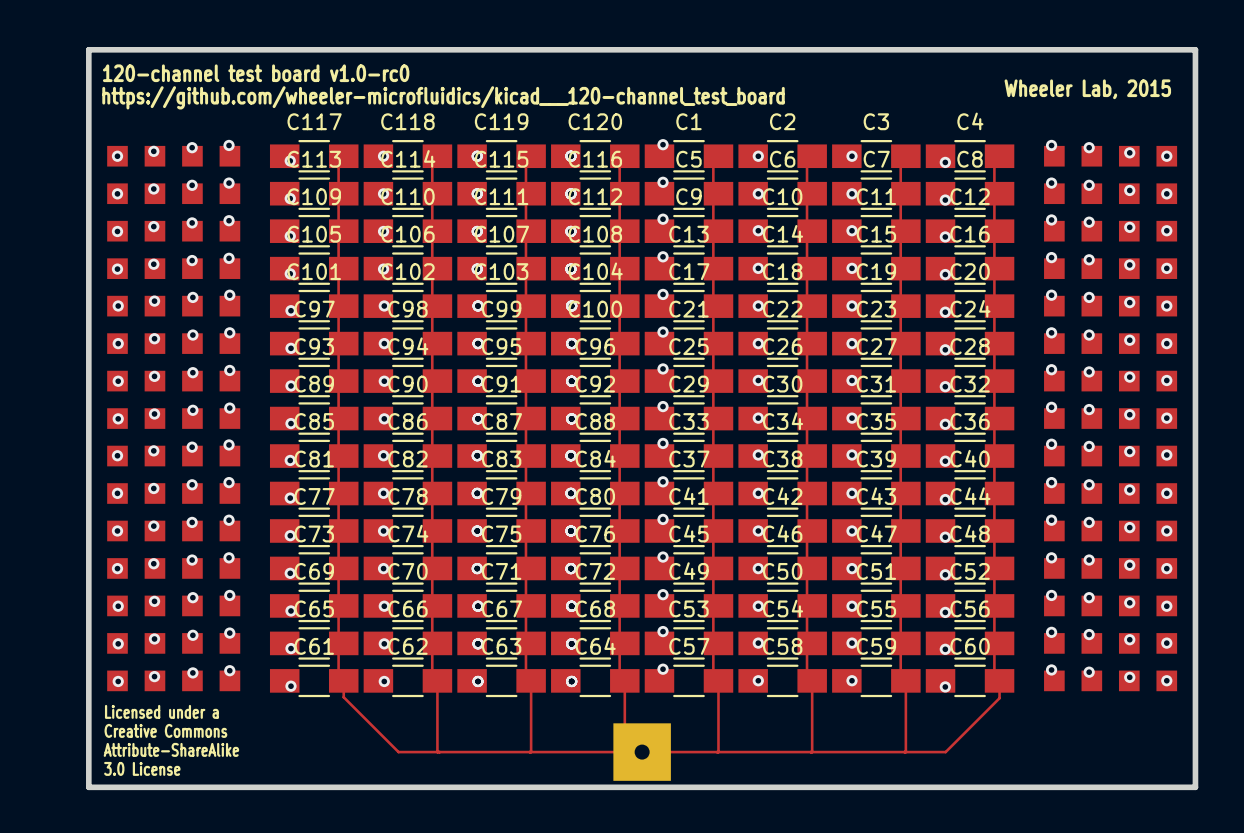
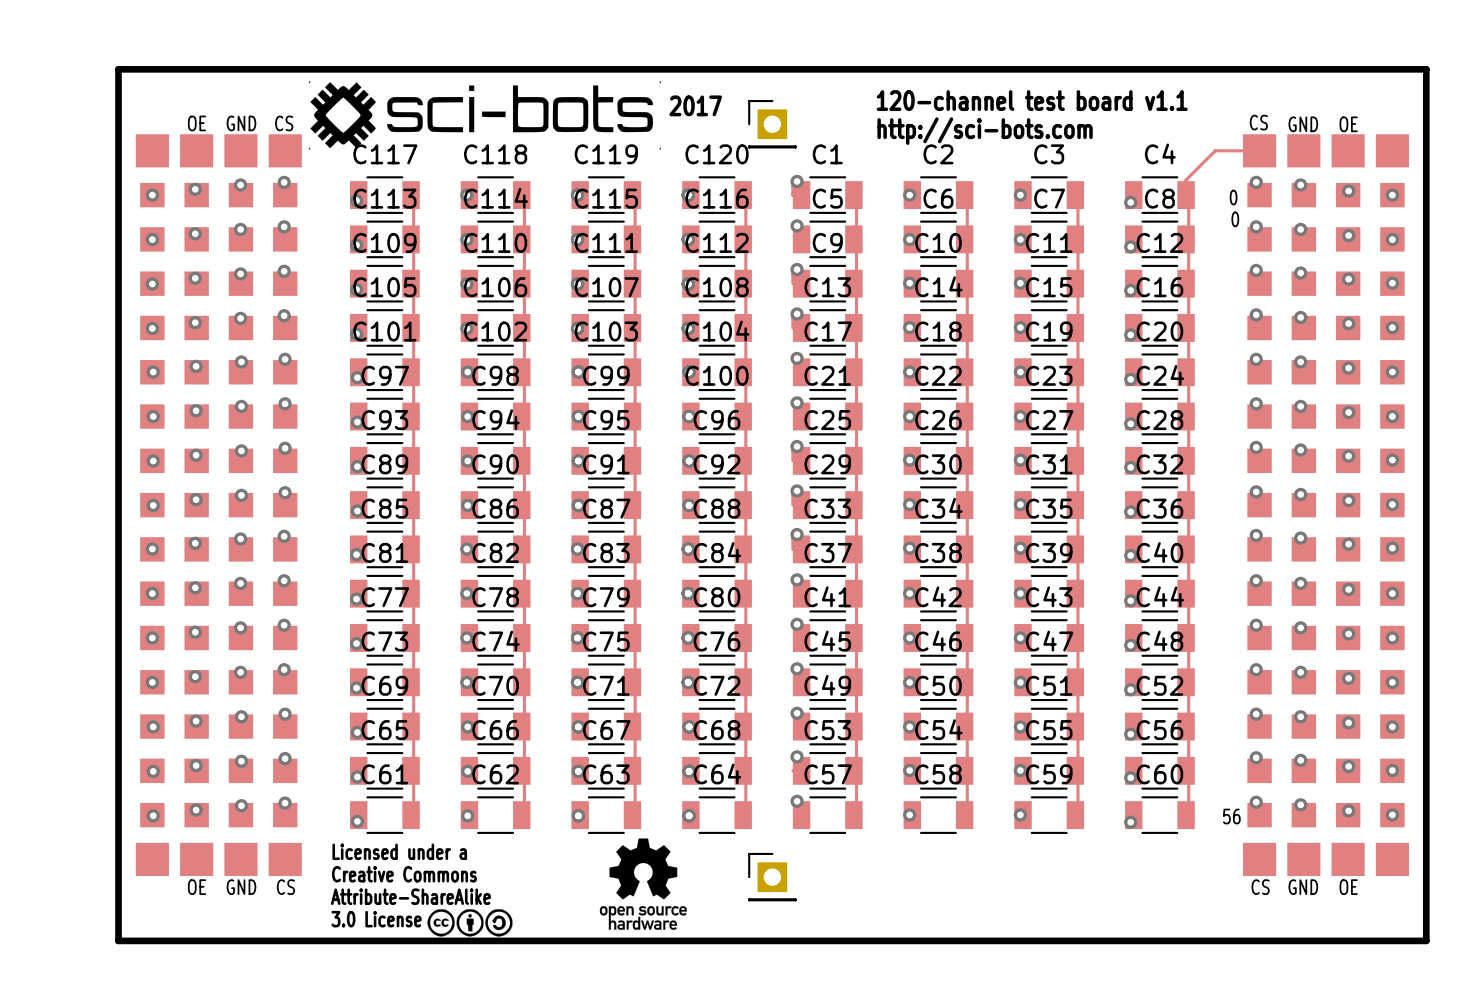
drawing: none -> [308, 81, 662, 150]
text: 120-channel test board v1.0-rc0 (256, 73) -> none
text: none -> 120-channel test board v1.1 (1032, 100)
text: none -> 2017 (695, 105)
text: Wheeler Lab, 2015 (1087, 89) -> GND (1303, 124)
text: none -> CS (1258, 122)
text: none -> OE (197, 123)
text: none -> GND (241, 123)
text: none -> CS (284, 123)
part: none -> (772, 124)
text: none -> OE (1348, 124)
text: https://github.com/wheeler-microfluidics/kicad___120-channel_test_board (443, 97) -> none
text: none -> http://sci-bots.com (985, 131)
part: none -> (152, 150)
part: none -> (196, 150)
part: none -> (240, 150)
part: none -> (285, 150)
track: none -> (1259, 150) (1215, 150) (1186, 180) (1186, 195)
part: none -> (1259, 150)
part: none -> (1303, 150)
part: none -> (1348, 150)
part: none -> (1392, 150)
C117 footprint: [269, 140, 359, 173] -> [350, 176, 420, 214]
C118 footprint: [363, 140, 453, 173] -> [460, 176, 531, 214]
C119 footprint: [457, 140, 546, 173] -> [571, 176, 642, 214]
C120 footprint: [551, 140, 640, 173] -> [682, 176, 752, 214]
C1 footprint: [644, 140, 734, 173] -> [792, 176, 863, 214]
C2 footprint: [738, 140, 827, 173] -> [903, 176, 974, 214]
C3 footprint: [832, 140, 921, 173] -> [1014, 176, 1085, 214]
C4 footprint: [925, 140, 1015, 173] -> [1125, 176, 1195, 214]
text: none -> 0 (1233, 197)
text: none -> 0 (1235, 219)
C113 footprint: [269, 177, 359, 210] -> [350, 220, 420, 259]
C114 footprint: [363, 177, 453, 210] -> [460, 220, 531, 259]
C115 footprint: [457, 177, 546, 210] -> [571, 220, 642, 259]
C116 footprint: [551, 177, 640, 210] -> [682, 220, 752, 259]
C5 footprint: [644, 177, 734, 210] -> [792, 220, 863, 259]
C6 footprint: [738, 177, 827, 210] -> [903, 220, 974, 259]
C7 footprint: [832, 177, 921, 210] -> [1014, 220, 1085, 259]
C8 footprint: [925, 177, 1015, 210] -> [1125, 220, 1195, 259]
C109 footprint: [269, 214, 359, 248] -> [350, 264, 420, 303]
C110 footprint: [363, 214, 453, 248] -> [460, 264, 531, 303]
C111 footprint: [457, 214, 546, 248] -> [571, 264, 642, 303]
C112 footprint: [551, 214, 640, 248] -> [682, 264, 752, 303]
C9 footprint: [644, 214, 734, 248] -> [792, 264, 863, 303]
C10 footprint: [738, 214, 827, 248] -> [903, 264, 974, 303]
C11 footprint: [832, 214, 921, 248] -> [1014, 264, 1085, 303]
C12 footprint: [925, 214, 1015, 248] -> [1125, 264, 1195, 303]
C105 footprint: [269, 252, 359, 285] -> [350, 309, 420, 347]
C106 footprint: [363, 252, 453, 285] -> [460, 309, 531, 347]
C107 footprint: [457, 252, 546, 285] -> [571, 309, 642, 347]
C108 footprint: [551, 252, 640, 285] -> [682, 309, 752, 347]
C13 footprint: [644, 252, 734, 285] -> [792, 309, 863, 347]
C14 footprint: [738, 252, 827, 285] -> [903, 309, 974, 347]
C15 footprint: [832, 252, 921, 285] -> [1014, 309, 1085, 347]
C16 footprint: [925, 252, 1015, 285] -> [1125, 309, 1195, 347]
C101 footprint: [269, 289, 359, 323] -> [350, 353, 420, 392]
C102 footprint: [363, 289, 453, 323] -> [460, 353, 531, 392]
C103 footprint: [457, 289, 546, 323] -> [571, 353, 642, 392]
C104 footprint: [551, 289, 640, 323] -> [682, 353, 752, 392]
C17 footprint: [644, 289, 734, 323] -> [792, 353, 863, 392]
C18 footprint: [738, 289, 827, 323] -> [903, 353, 974, 392]
C19 footprint: [832, 289, 921, 323] -> [1014, 353, 1085, 392]
C20 footprint: [925, 289, 1015, 323] -> [1125, 353, 1195, 392]
C97 footprint: [269, 327, 359, 360] -> [350, 397, 420, 436]
C98 footprint: [363, 327, 453, 360] -> [460, 397, 531, 436]
C99 footprint: [457, 327, 546, 360] -> [571, 397, 642, 436]
C100 footprint: [551, 327, 640, 360] -> [682, 397, 752, 436]
C21 footprint: [644, 327, 734, 360] -> [792, 397, 863, 436]
C22 footprint: [738, 327, 827, 360] -> [903, 397, 974, 436]
C23 footprint: [832, 327, 921, 360] -> [1014, 397, 1085, 436]
C24 footprint: [925, 327, 1015, 360] -> [1125, 397, 1195, 436]
C93 footprint: [269, 364, 359, 398] -> [350, 442, 420, 480]
C94 footprint: [363, 364, 453, 398] -> [460, 442, 531, 480]
C95 footprint: [457, 364, 546, 398] -> [571, 442, 642, 480]
C96 footprint: [551, 364, 640, 398] -> [682, 442, 752, 480]
C25 footprint: [644, 364, 734, 398] -> [792, 442, 863, 480]
C26 footprint: [738, 364, 827, 398] -> [903, 442, 974, 480]
C27 footprint: [832, 364, 921, 398] -> [1014, 442, 1085, 480]
C28 footprint: [925, 364, 1015, 398] -> [1125, 442, 1195, 480]
C89 footprint: [269, 402, 359, 435] -> [350, 486, 420, 524]
C90 footprint: [363, 402, 453, 435] -> [460, 486, 531, 524]
C91 footprint: [457, 402, 546, 435] -> [571, 486, 642, 524]
C92 footprint: [551, 402, 640, 435] -> [682, 486, 752, 524]
C29 footprint: [644, 402, 734, 435] -> [792, 486, 863, 524]
C30 footprint: [738, 402, 827, 435] -> [903, 486, 974, 524]
C31 footprint: [832, 402, 921, 435] -> [1014, 486, 1085, 524]
C32 footprint: [925, 402, 1015, 435] -> [1125, 486, 1195, 524]
C85 footprint: [269, 439, 359, 473] -> [350, 530, 420, 569]
C86 footprint: [363, 439, 453, 473] -> [460, 530, 531, 569]
C87 footprint: [457, 439, 546, 473] -> [571, 530, 642, 569]
C88 footprint: [551, 439, 640, 473] -> [682, 530, 752, 569]
C33 footprint: [644, 439, 734, 473] -> [792, 530, 863, 569]
C34 footprint: [738, 439, 827, 473] -> [903, 530, 974, 569]
C35 footprint: [832, 439, 921, 473] -> [1014, 530, 1085, 569]
C36 footprint: [925, 439, 1015, 473] -> [1125, 530, 1195, 569]
C81 footprint: [269, 477, 359, 510] -> [350, 574, 420, 613]
C82 footprint: [363, 477, 453, 510] -> [460, 574, 531, 613]
C83 footprint: [457, 477, 546, 510] -> [571, 574, 642, 613]
C84 footprint: [551, 477, 640, 510] -> [682, 574, 752, 613]
C37 footprint: [644, 477, 734, 510] -> [792, 574, 863, 613]
C38 footprint: [738, 477, 827, 510] -> [903, 574, 974, 613]
C39 footprint: [832, 477, 921, 510] -> [1014, 574, 1085, 613]
C40 footprint: [925, 477, 1015, 510] -> [1125, 574, 1195, 613]
C77 footprint: [269, 514, 359, 548] -> [350, 619, 420, 657]
C78 footprint: [363, 514, 453, 548] -> [460, 619, 531, 657]
C79 footprint: [457, 514, 546, 548] -> [571, 619, 642, 657]
C80 footprint: [551, 514, 640, 548] -> [682, 619, 752, 657]
C41 footprint: [644, 514, 734, 548] -> [792, 619, 863, 657]
C42 footprint: [738, 514, 827, 548] -> [903, 619, 974, 657]
C43 footprint: [832, 514, 921, 548] -> [1014, 619, 1085, 657]
C44 footprint: [925, 514, 1015, 548] -> [1125, 619, 1195, 657]
C73 footprint: [269, 552, 359, 585] -> [350, 663, 420, 702]
C74 footprint: [363, 552, 453, 585] -> [460, 663, 531, 702]
C75 footprint: [457, 552, 546, 585] -> [571, 663, 642, 702]
C76 footprint: [551, 552, 640, 585] -> [682, 663, 752, 702]
C45 footprint: [644, 552, 734, 585] -> [792, 663, 863, 702]
C46 footprint: [738, 552, 827, 585] -> [903, 663, 974, 702]
C47 footprint: [832, 552, 921, 585] -> [1014, 663, 1085, 702]
C48 footprint: [925, 552, 1015, 585] -> [1125, 663, 1195, 702]
C69 footprint: [269, 589, 359, 623] -> [350, 707, 420, 746]
C70 footprint: [363, 589, 453, 623] -> [460, 707, 531, 746]
C71 footprint: [457, 589, 546, 623] -> [571, 707, 642, 746]
C72 footprint: [551, 589, 640, 623] -> [682, 707, 752, 746]
C49 footprint: [644, 589, 734, 623] -> [792, 707, 863, 746]
C50 footprint: [738, 589, 827, 623] -> [903, 707, 974, 746]
C51 footprint: [832, 589, 921, 623] -> [1014, 707, 1085, 746]
C52 footprint: [925, 589, 1015, 623] -> [1125, 707, 1195, 746]
C65 footprint: [269, 627, 359, 660] -> [350, 752, 420, 790]
C66 footprint: [363, 627, 453, 660] -> [460, 752, 531, 790]
C67 footprint: [457, 627, 546, 660] -> [571, 752, 642, 790]
C68 footprint: [551, 627, 640, 660] -> [682, 752, 752, 790]
C53 footprint: [644, 627, 734, 660] -> [792, 752, 863, 790]
C54 footprint: [738, 627, 827, 660] -> [903, 752, 974, 790]
C55 footprint: [832, 627, 921, 660] -> [1014, 752, 1085, 790]
C56 footprint: [925, 627, 1015, 660] -> [1125, 752, 1195, 790]
C61 footprint: [269, 664, 359, 698] -> [350, 796, 420, 834]
C62 footprint: [363, 664, 453, 698] -> [460, 796, 531, 834]
C63 footprint: [457, 664, 546, 698] -> [571, 796, 642, 834]
C64 footprint: [551, 664, 640, 698] -> [682, 796, 752, 834]
C57 footprint: [644, 664, 734, 698] -> [792, 796, 863, 834]
C58 footprint: [738, 664, 827, 698] -> [903, 796, 974, 834]
C59 footprint: [832, 664, 921, 698] -> [1014, 796, 1085, 834]
C60 footprint: [925, 664, 1015, 698] -> [1125, 796, 1195, 834]
track: (343, 680) (343, 697) (398, 752) (945, 752) (999, 698) (999, 680) -> none
track: (437, 680) (437, 752) -> none
track: (531, 680) (531, 752) -> none
track: (624, 680) (624, 734) (642, 752) -> none
track: (718, 680) (718, 752) -> none
track: (812, 680) (812, 752) -> none
track: (905, 680) (905, 752) -> none
text: none -> 56 (1231, 816)
drawing: none -> [599, 838, 687, 930]
text position: Licensed under a (161, 711) -> Licensed under a (399, 851)
part: none -> (152, 859)
part: none -> (196, 859)
part: none -> (240, 859)
part: none -> (285, 859)
part: none -> (1259, 859)
part: none -> (1303, 859)
part: none -> (1348, 859)
part: none -> (1392, 859)
text position: Creative Commons (165, 730) -> Creative Commons (404, 874)
part: none -> (772, 877)
text: none -> OE (197, 887)
text: none -> GND (241, 887)
text: none -> CS (285, 887)
text: none -> CS (1260, 887)
text: none -> GND (1303, 887)
text: none -> OE (1348, 887)
text position: Attribute-ShareAlike (171, 749) -> Attribute-ShareAlike (410, 896)
part: (642, 752) -> none
drawing: none -> [427, 909, 513, 937]
text position: 3.0 License (142, 768) -> 3.0 License (376, 919)

